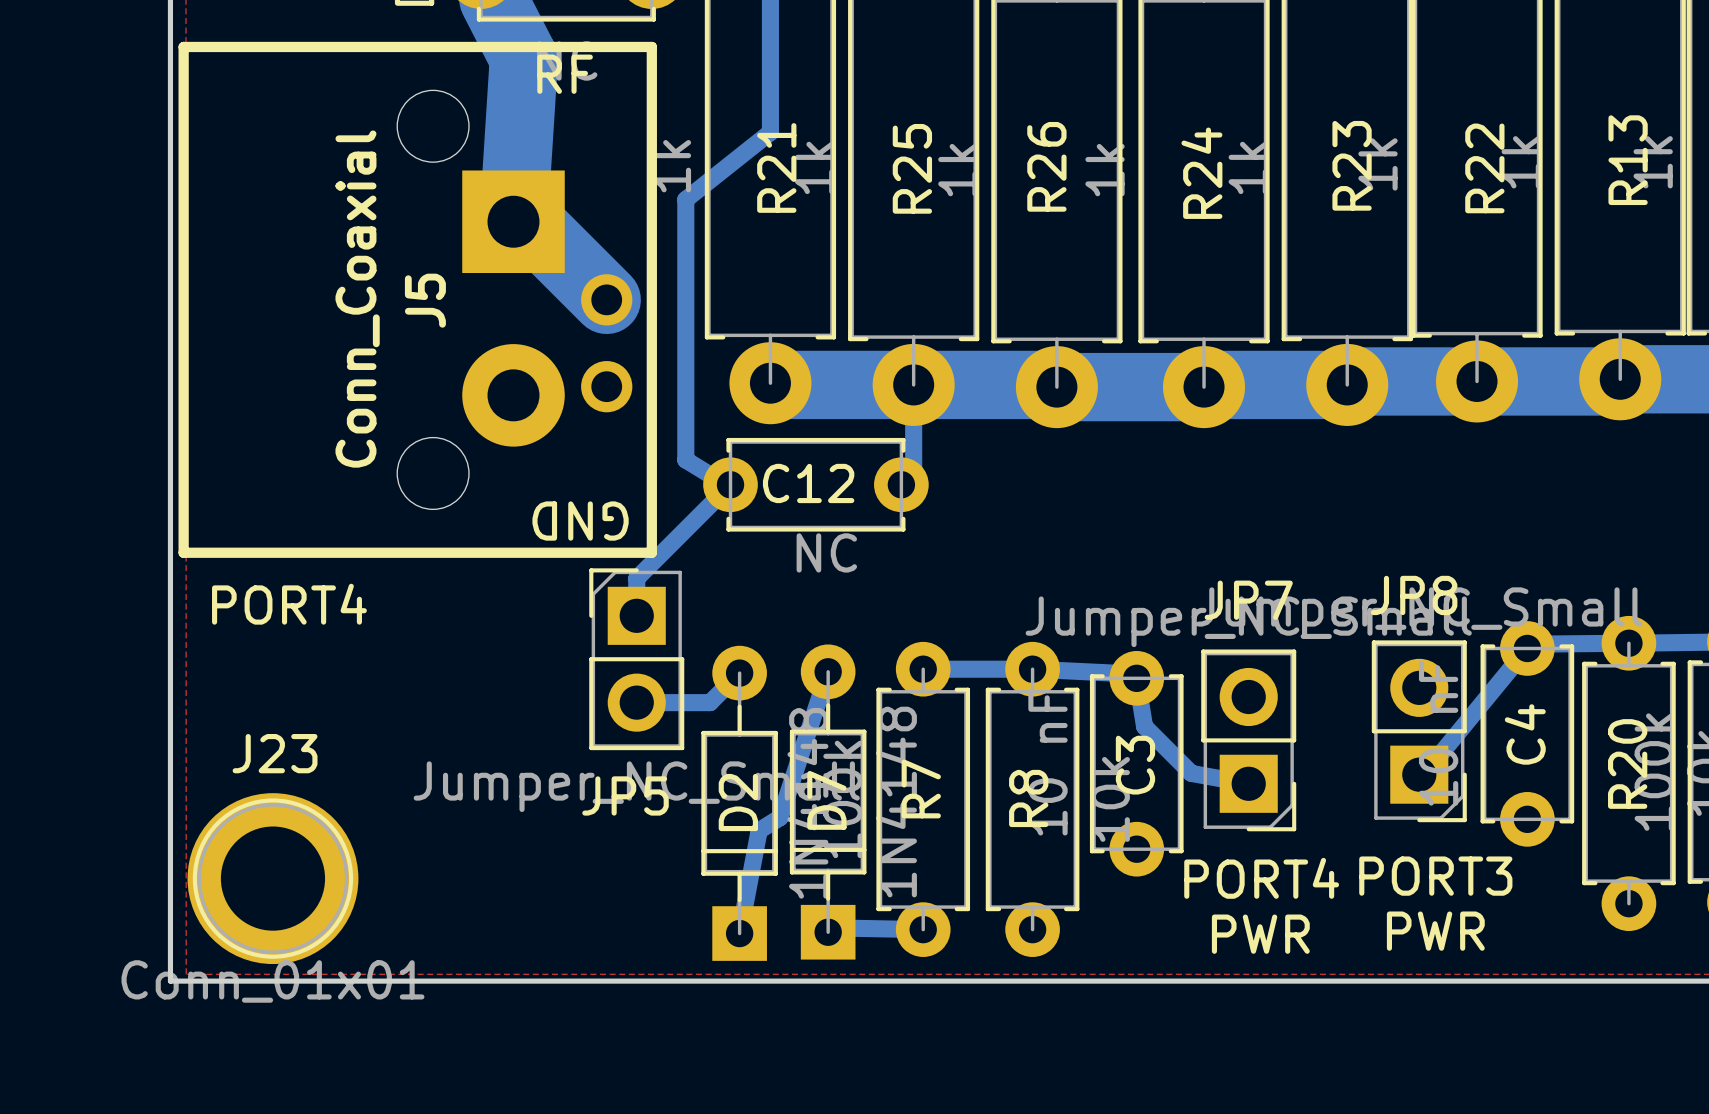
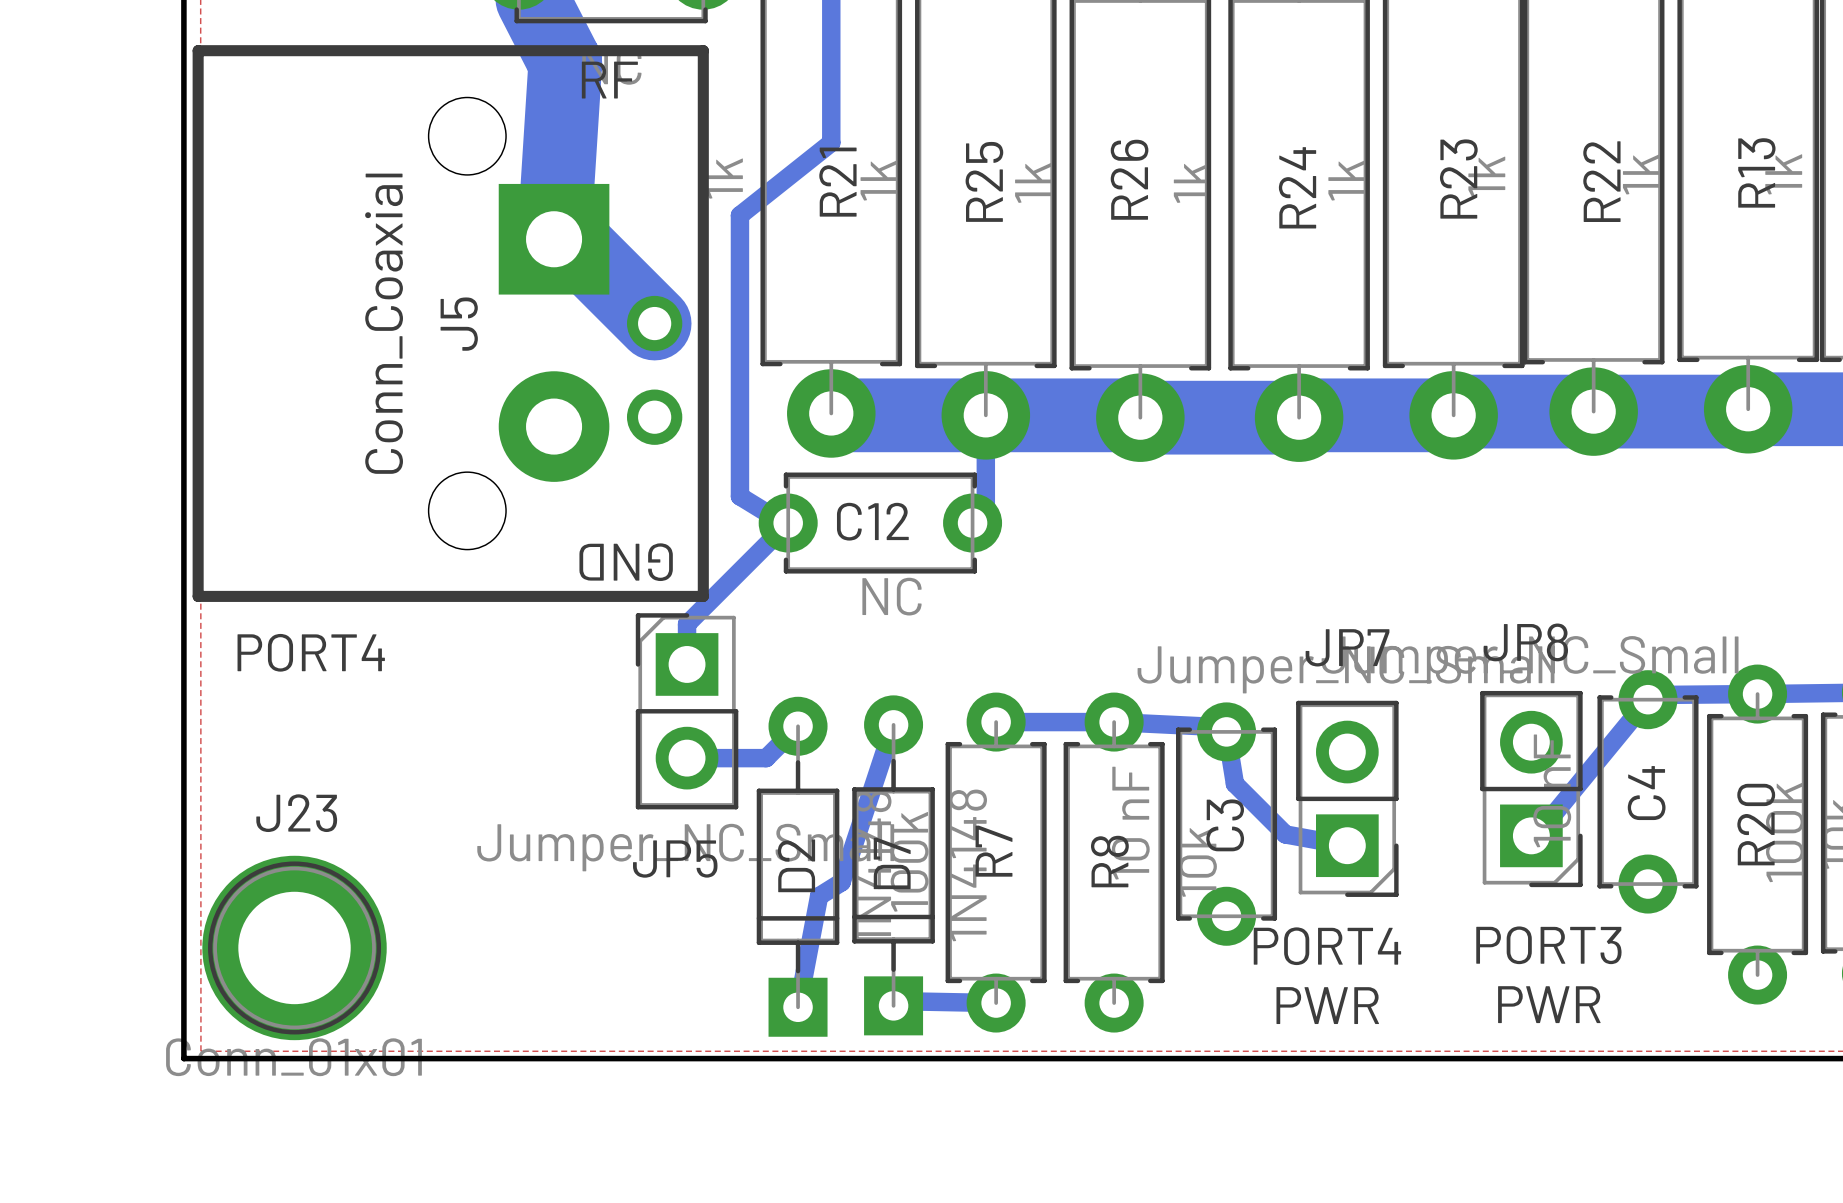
text position: PORT4 (1261, 878) -> PORT4 (1327, 946)
text position: PWR (1260, 934) -> PWR (1327, 1005)

